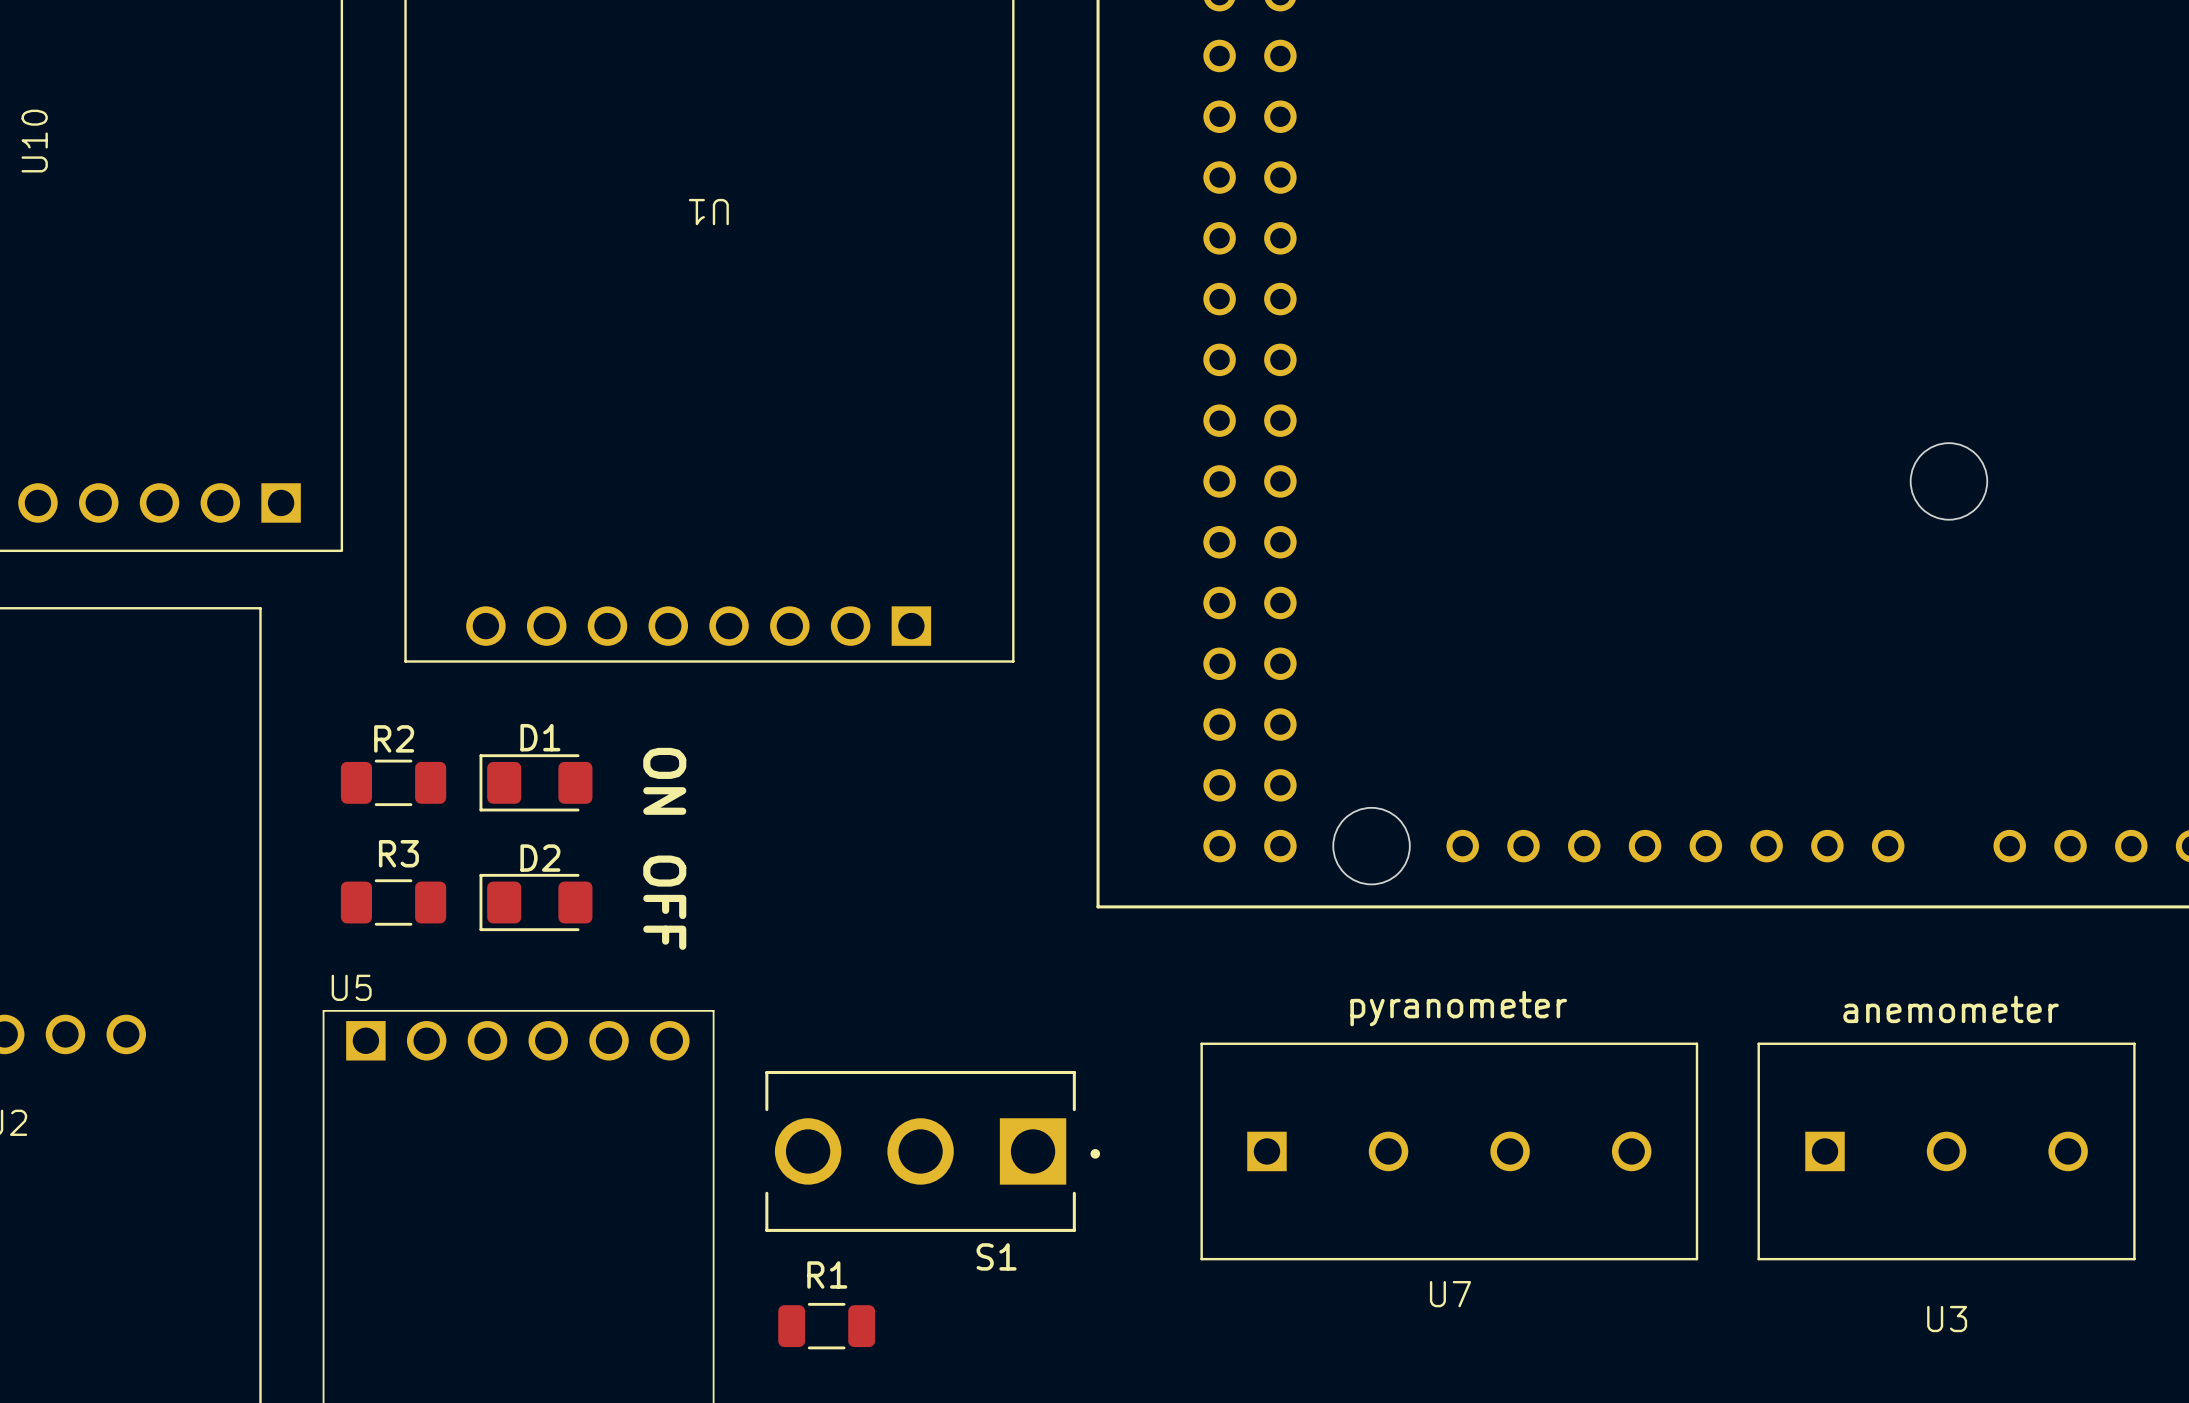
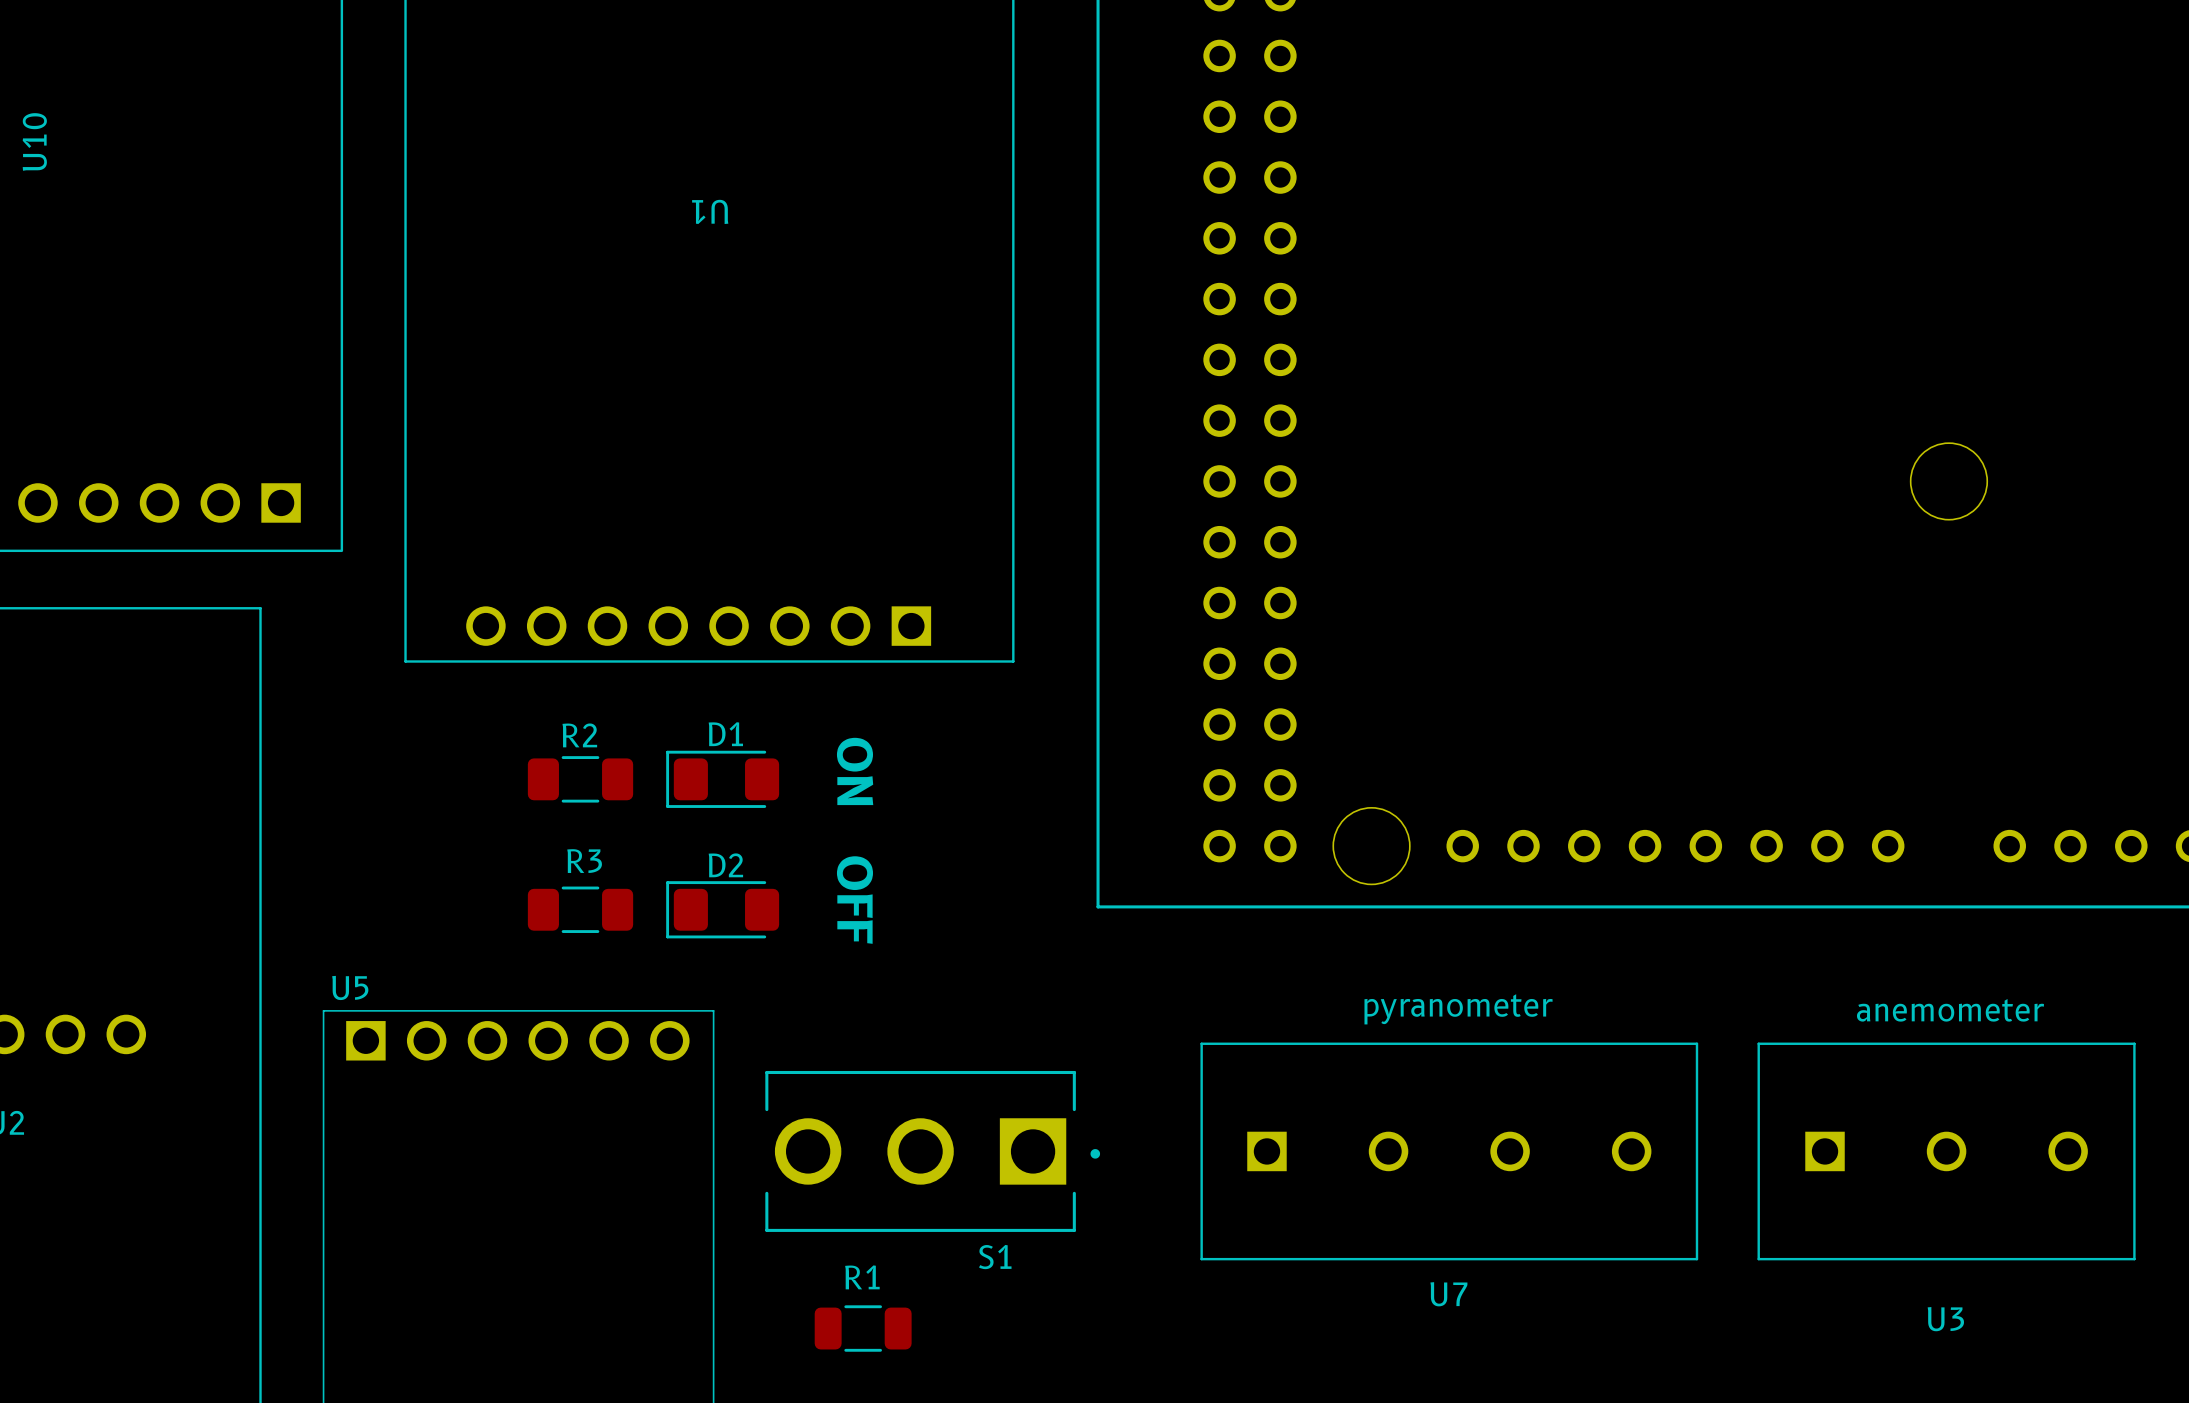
text position: ON (664, 781) -> ON (855, 771)
R2 position: (393, 782) -> (580, 779)
D1 position: (535, 782) -> (722, 779)
R3 position: (393, 902) -> (580, 909)
D2 position: (535, 902) -> (722, 909)
text position: OFF (664, 902) -> OFF (854, 900)
R1 position: (826, 1326) -> (863, 1328)

